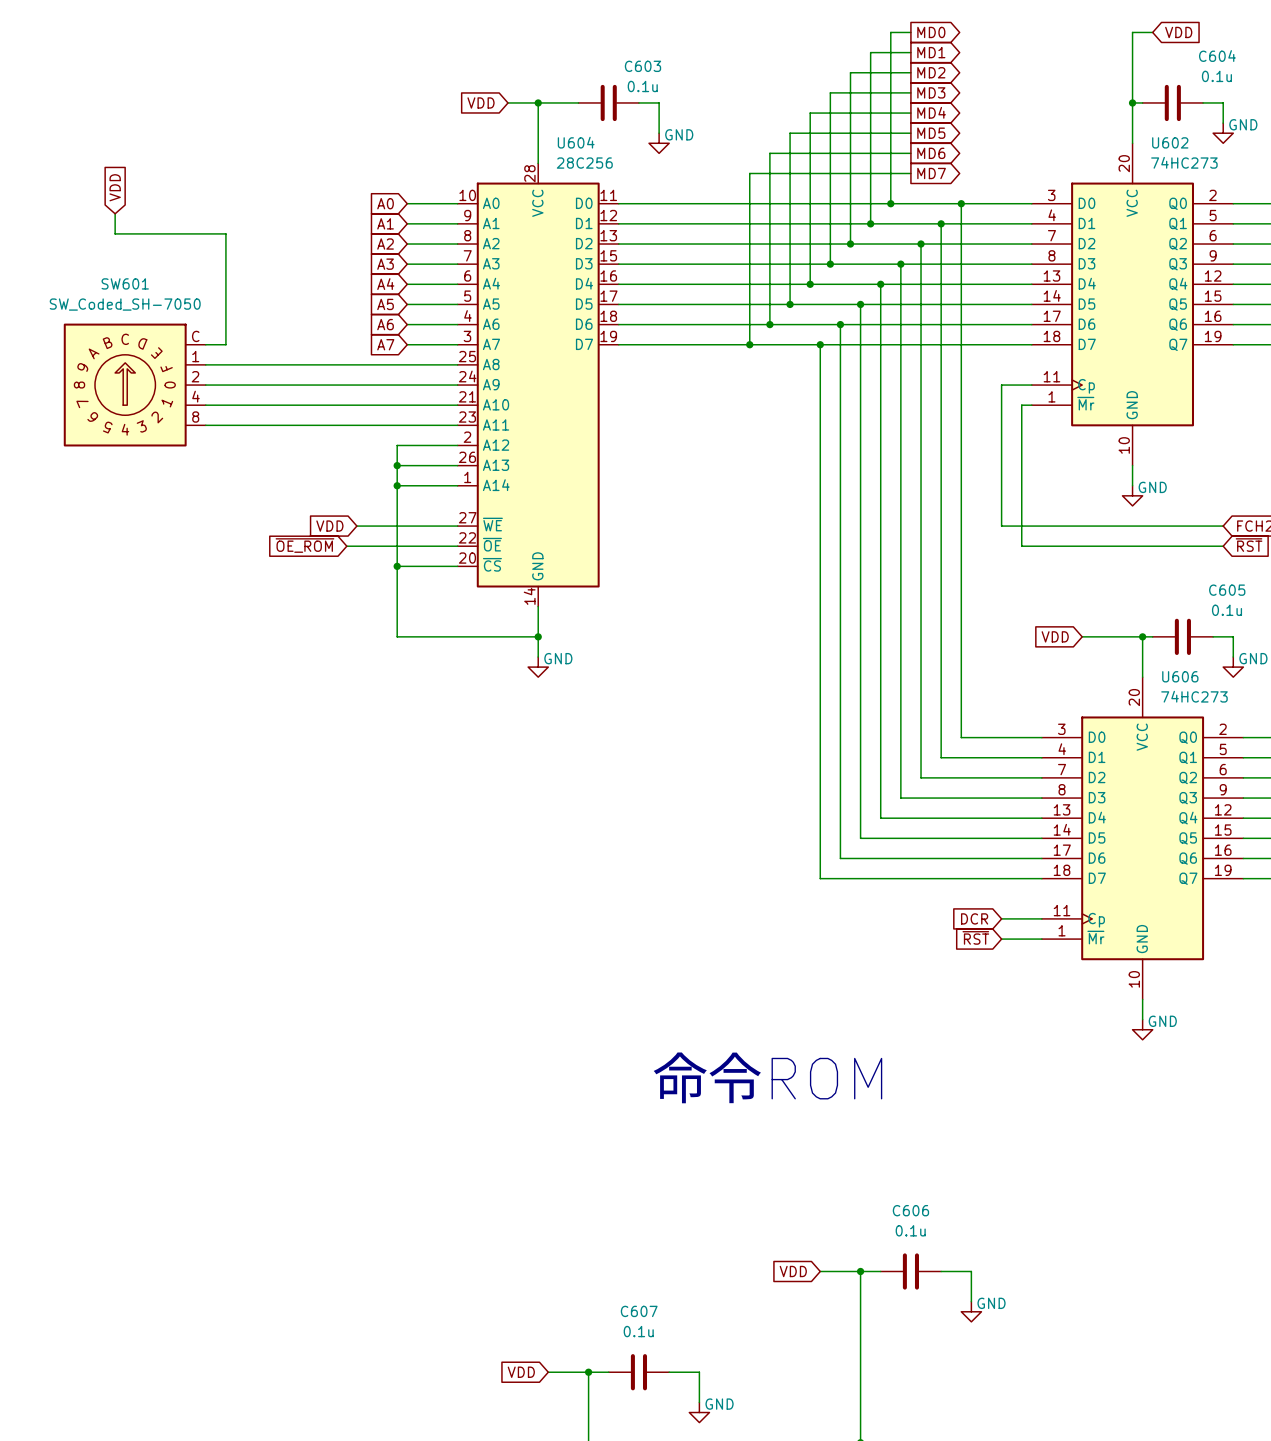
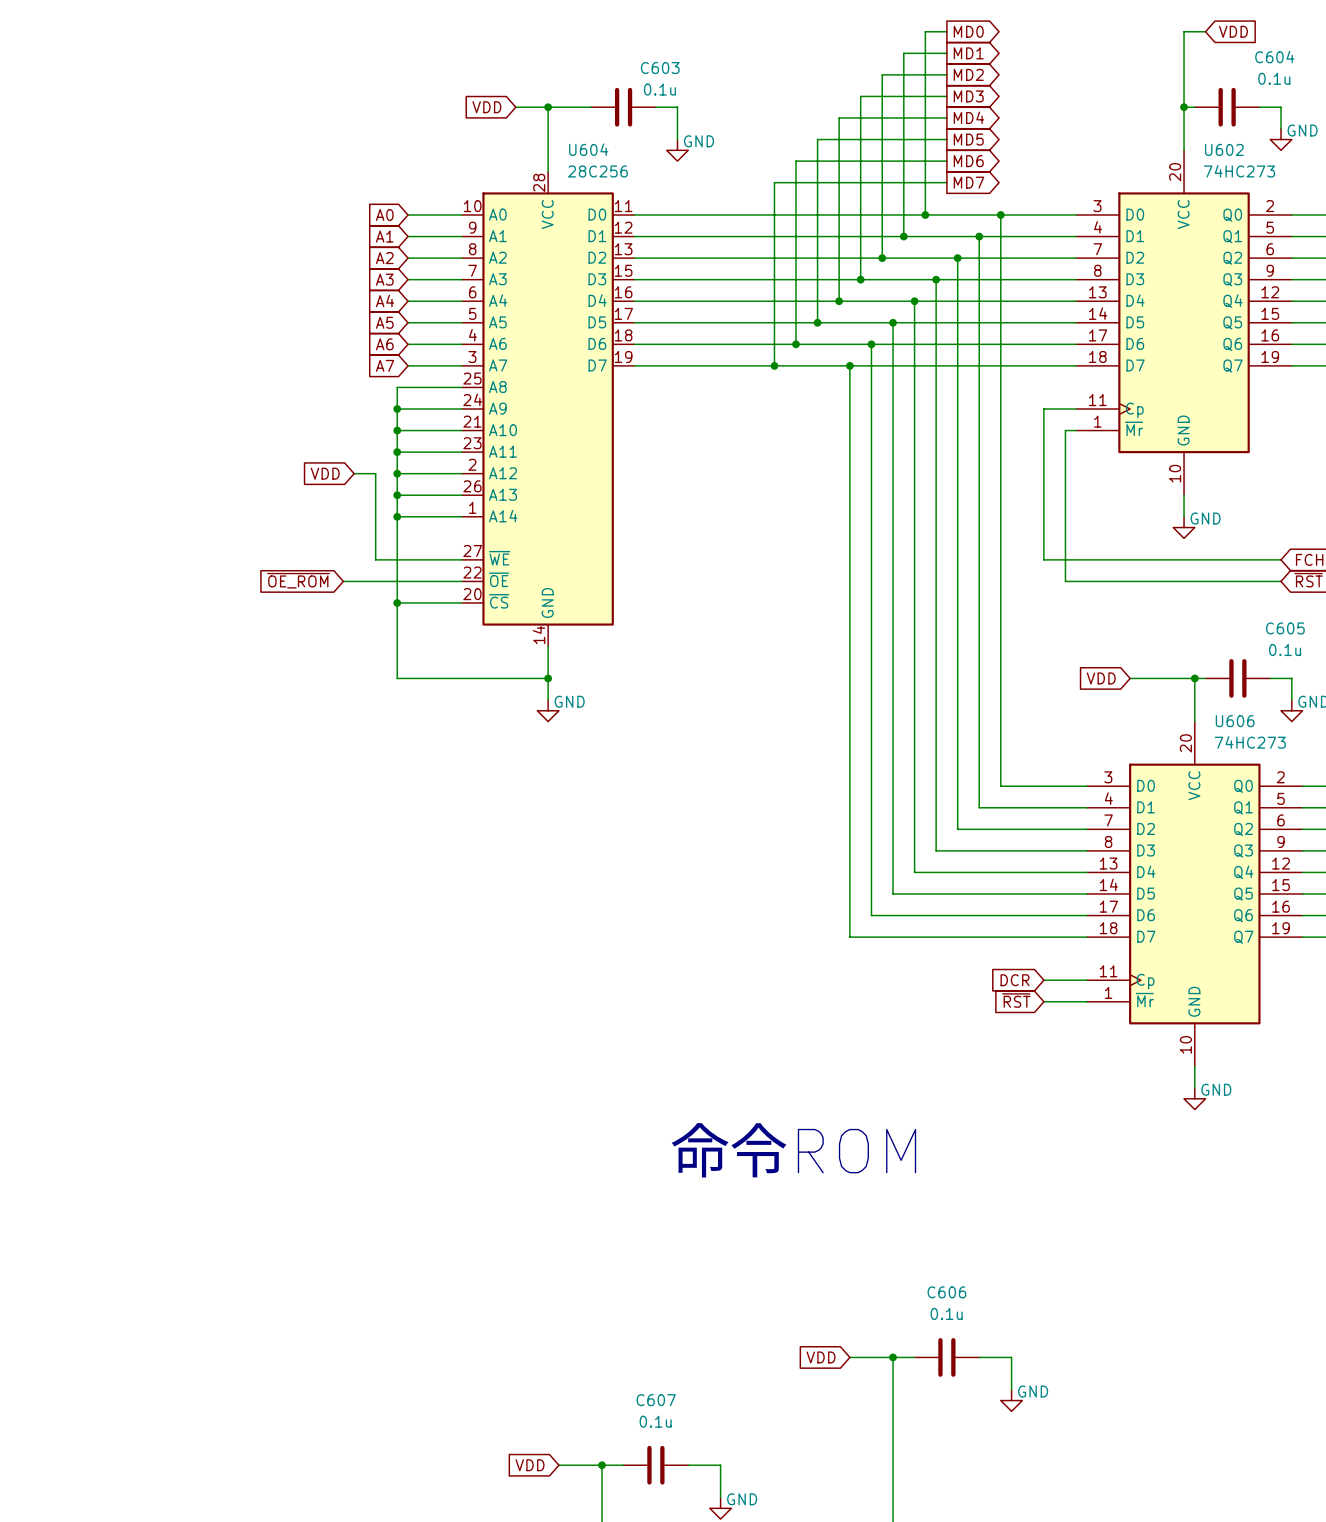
global label: VDD (115, 187) -> none
wire: (115, 213) (115, 233) (225, 233) (225, 344) (205, 344) -> none
wire: (205, 364) (397, 364) -> (397, 473) (397, 387)
SW601: SW_Coded_SH-7050 (134, 385) -> none
wire: (205, 385) (397, 385) -> none
junction: none -> (397, 409)
wire: (205, 405) (397, 405) -> none
junction: none -> (397, 430)
wire: (205, 425) (397, 425) -> none
junction: none -> (397, 452)
junction: none -> (397, 473)
global label position: VDD (329, 526) -> VDD (325, 473)
wire: (356, 526) (377, 526) -> (354, 473) (375, 473) (375, 559)

